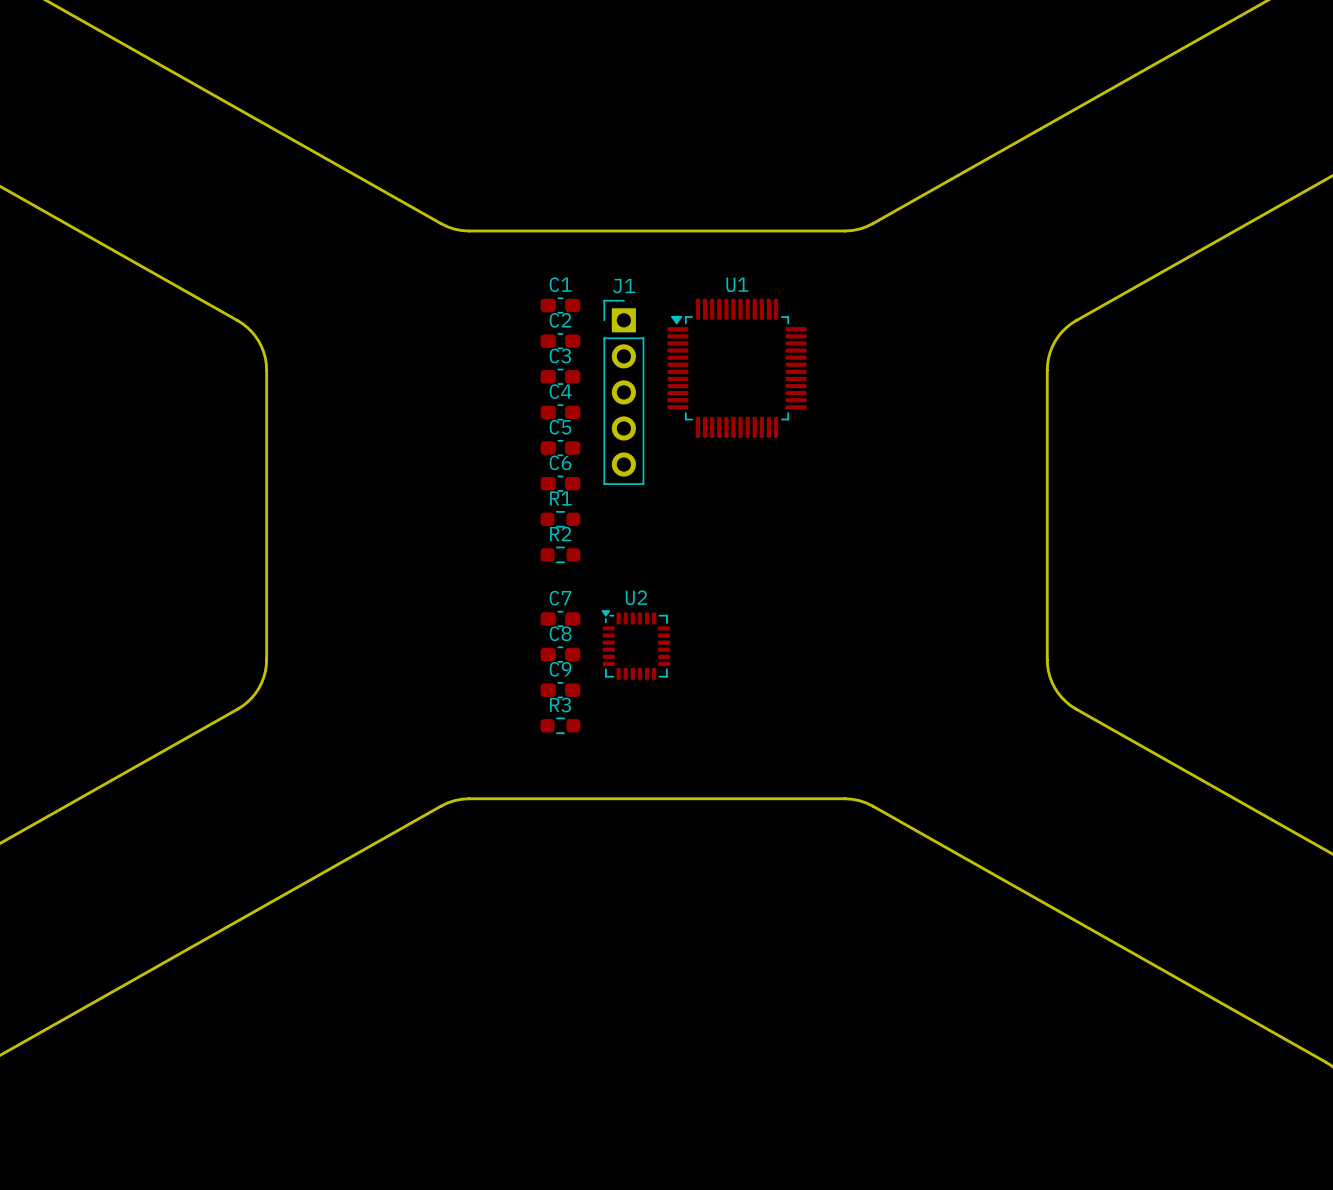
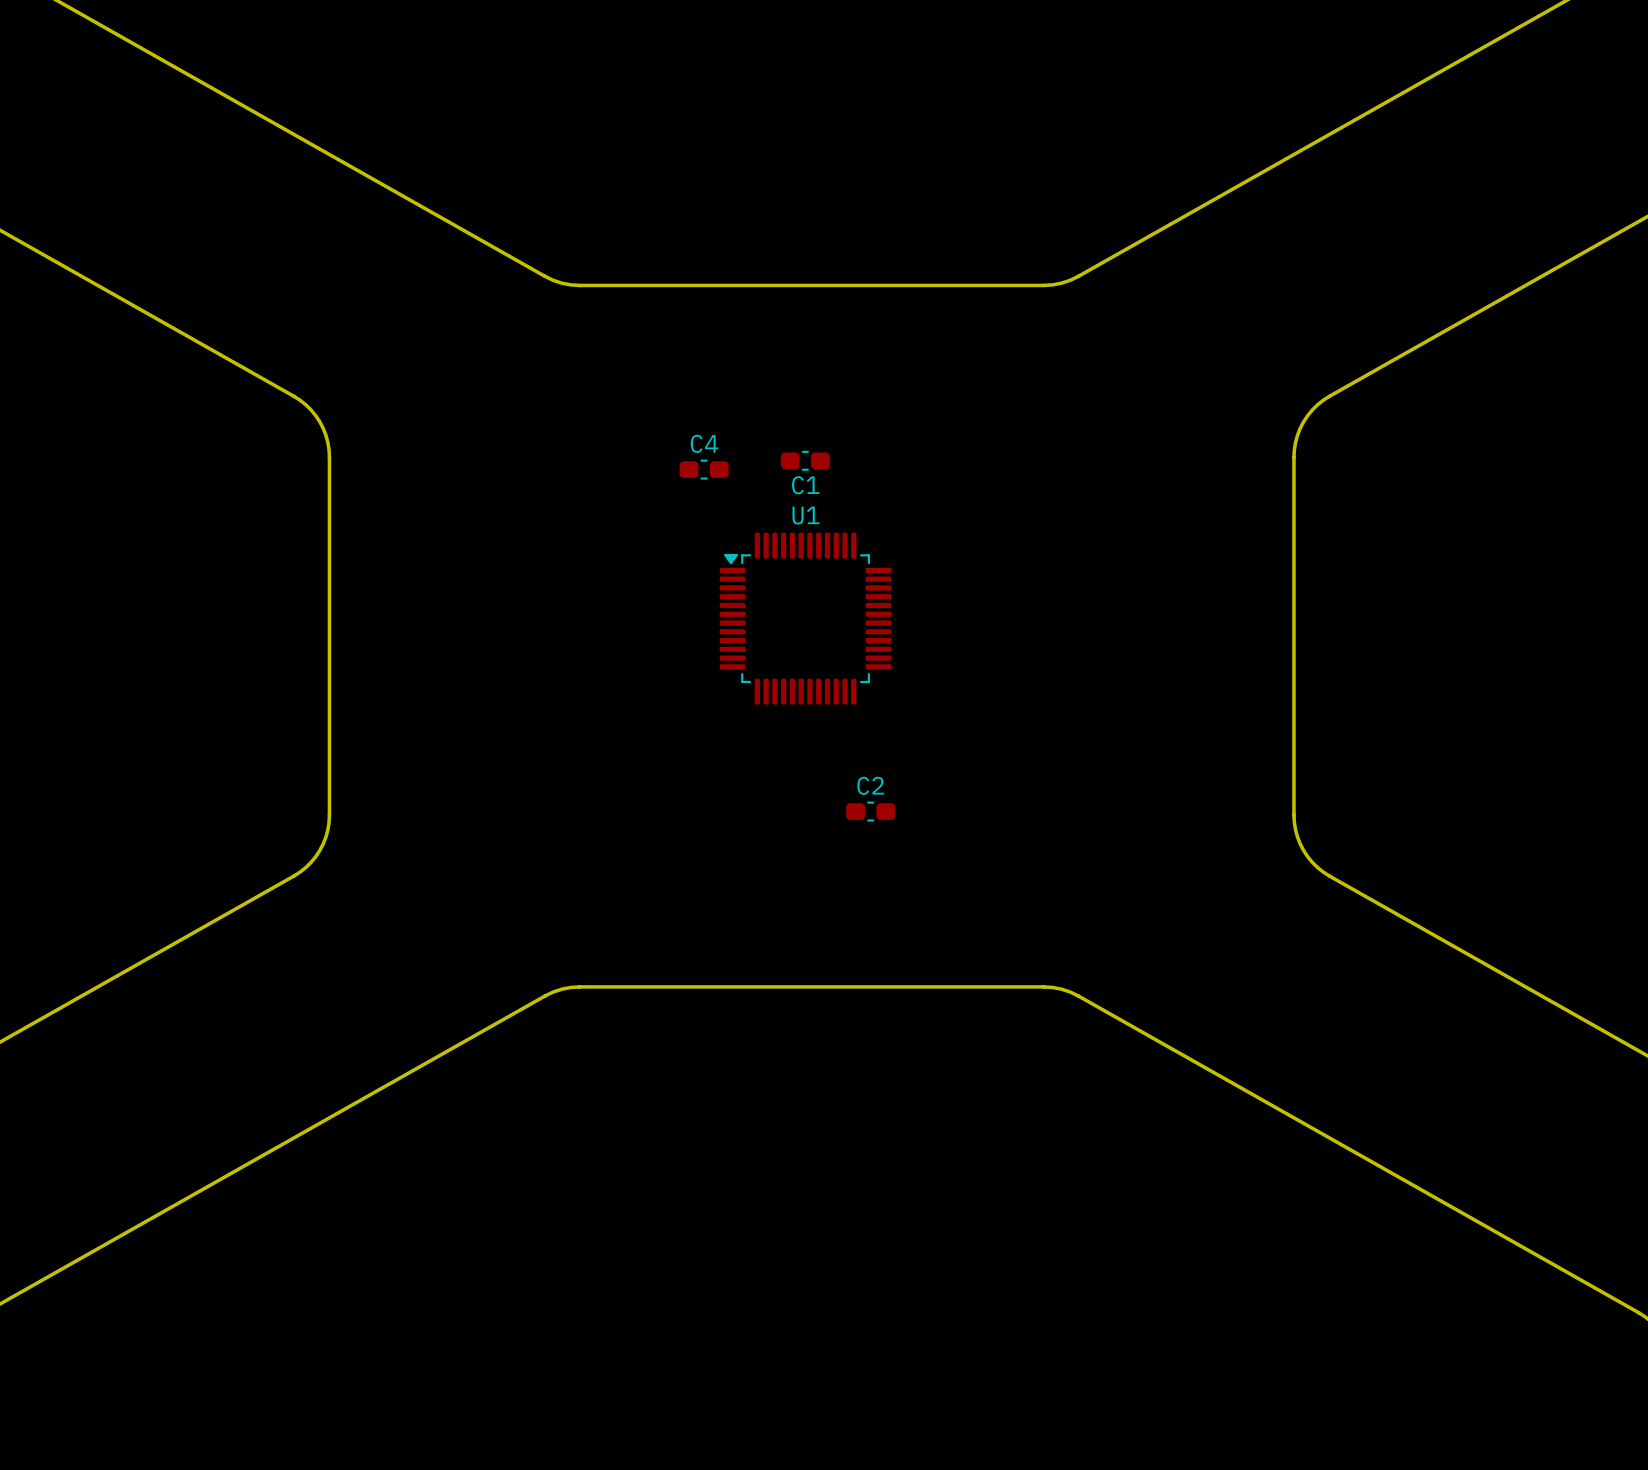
C1 name position: C1 (560, 284) -> C1 (805, 485)
C1 position: (560, 305) -> (805, 460)
C2 position: (560, 341) -> (870, 811)
U1 position: (737, 368) -> (805, 618)
C3: (560, 376) -> none
J1: (623, 392) -> none
C4 position: (560, 412) -> (704, 469)
C5: (560, 448) -> none
C6: (560, 483) -> none
R1: (560, 519) -> none
R2: (560, 554) -> none
C7: (560, 618) -> none
U2: (635, 645) -> none
C8: (560, 654) -> none
C9: (560, 690) -> none
R3: (560, 725) -> none

